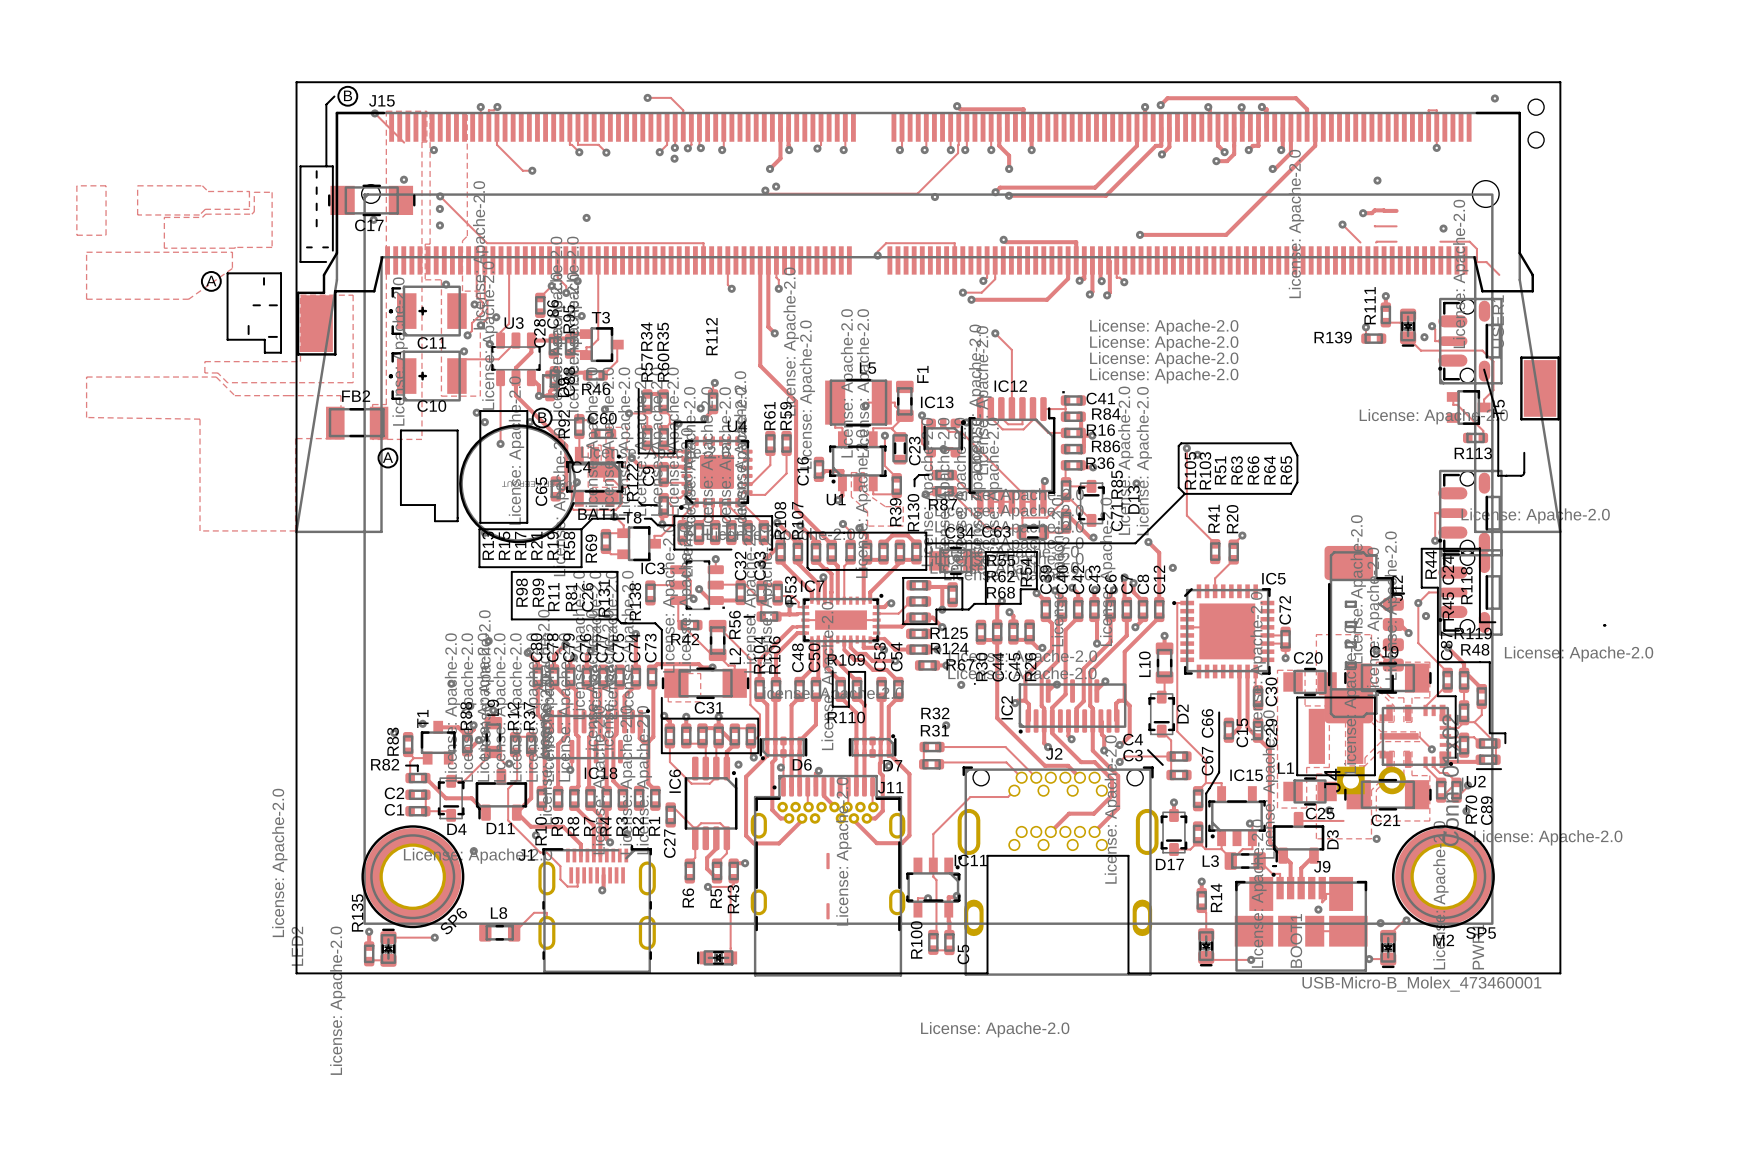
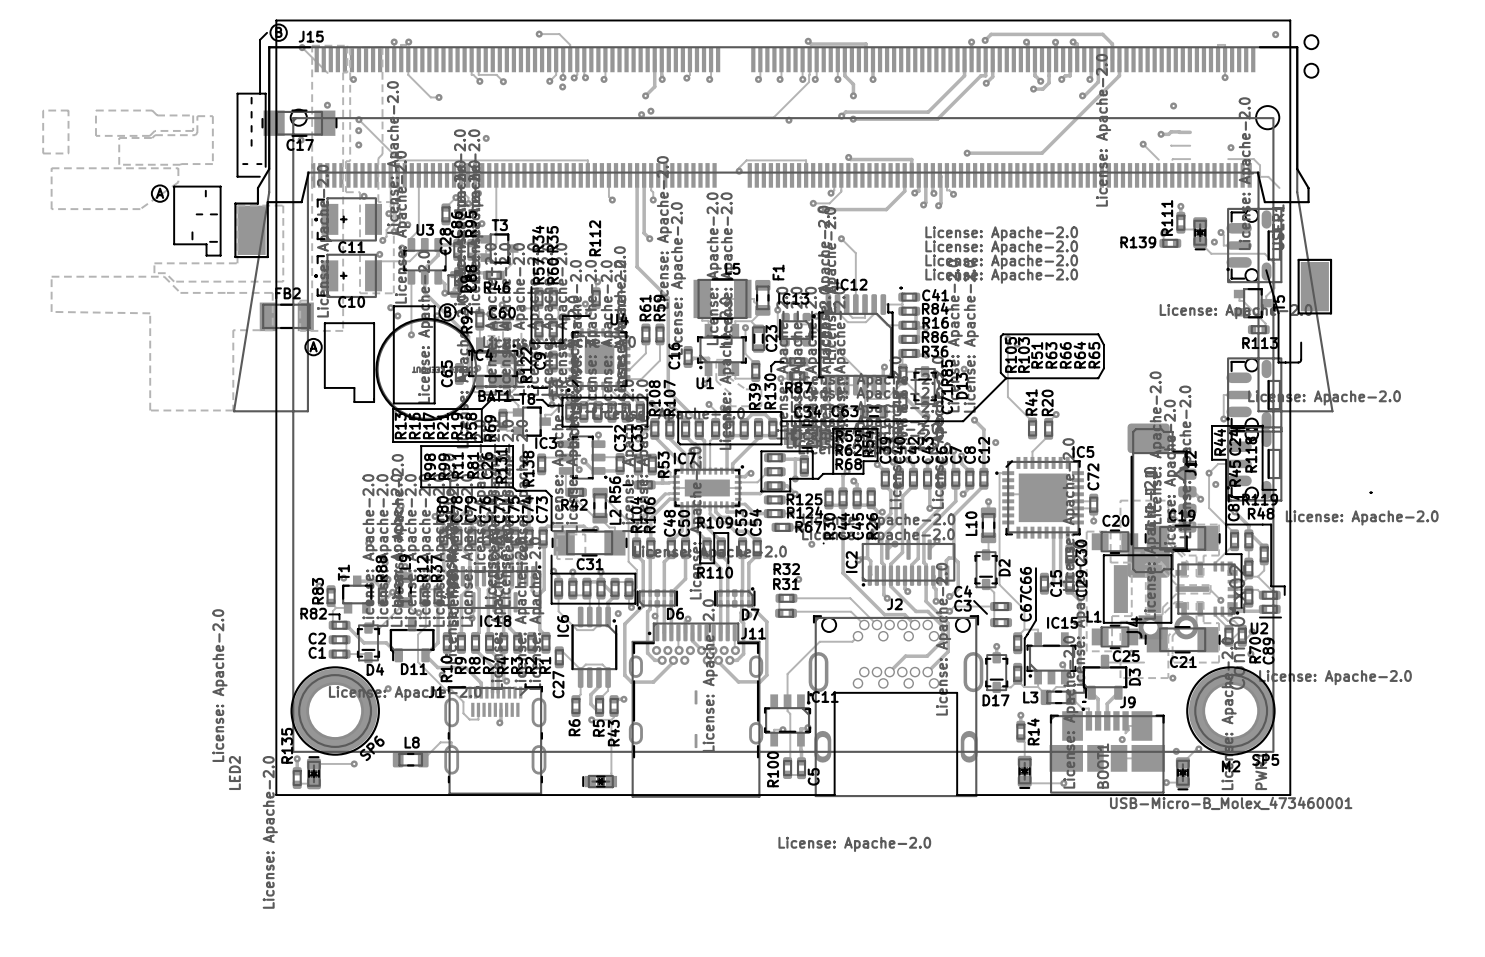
board edge: (345, 82) (296, 82) (296, 973) (345, 973) -> (276, 20) (276, 795)
board edge: (1511, 82) (1560, 82) (1560, 973) (1511, 973) -> (1290, 20) (1290, 795)

